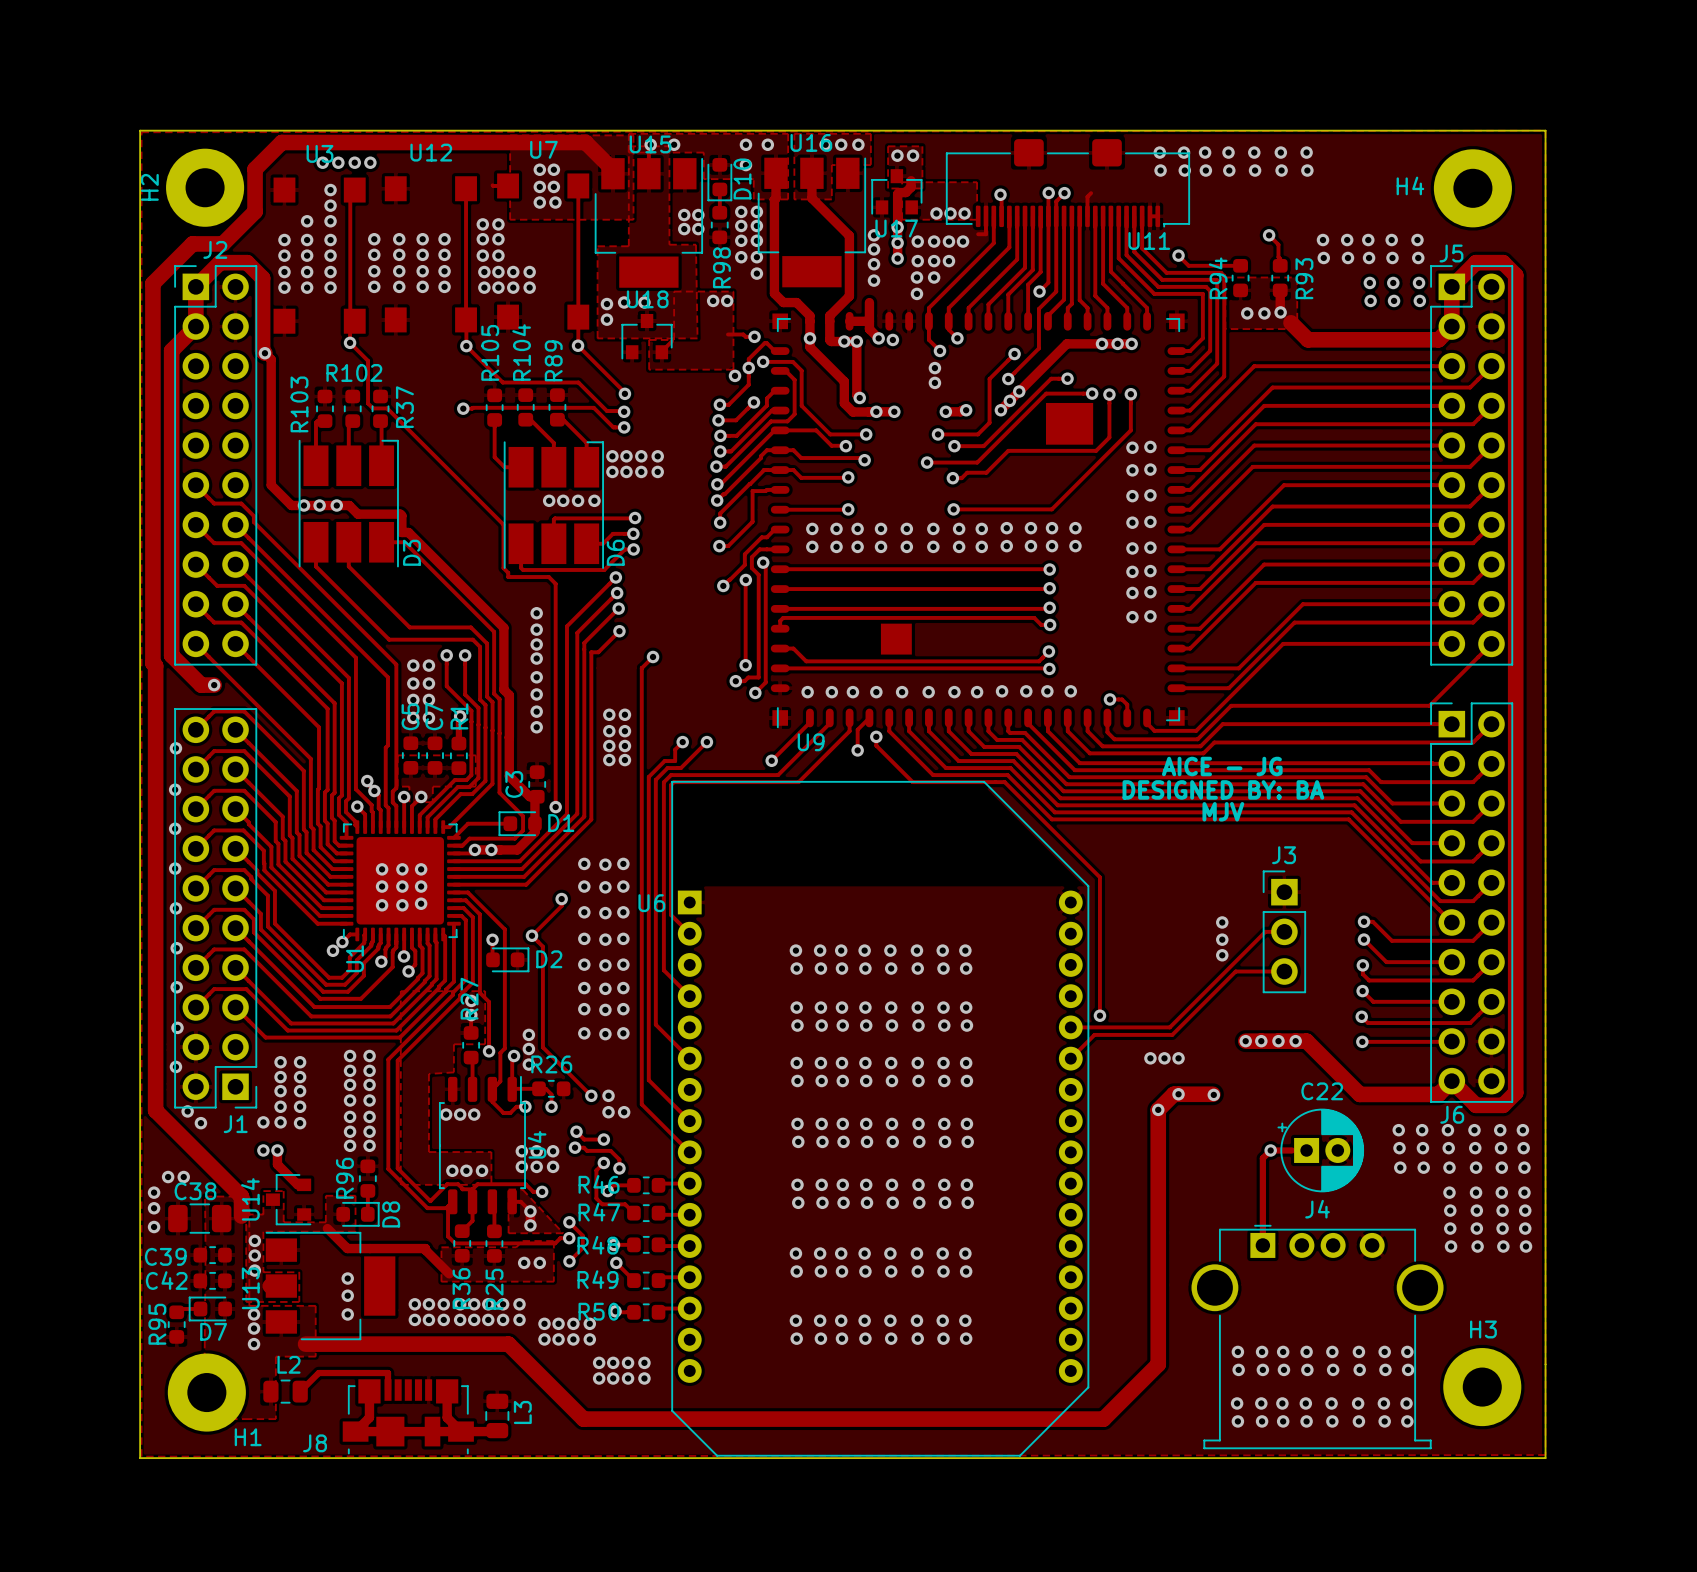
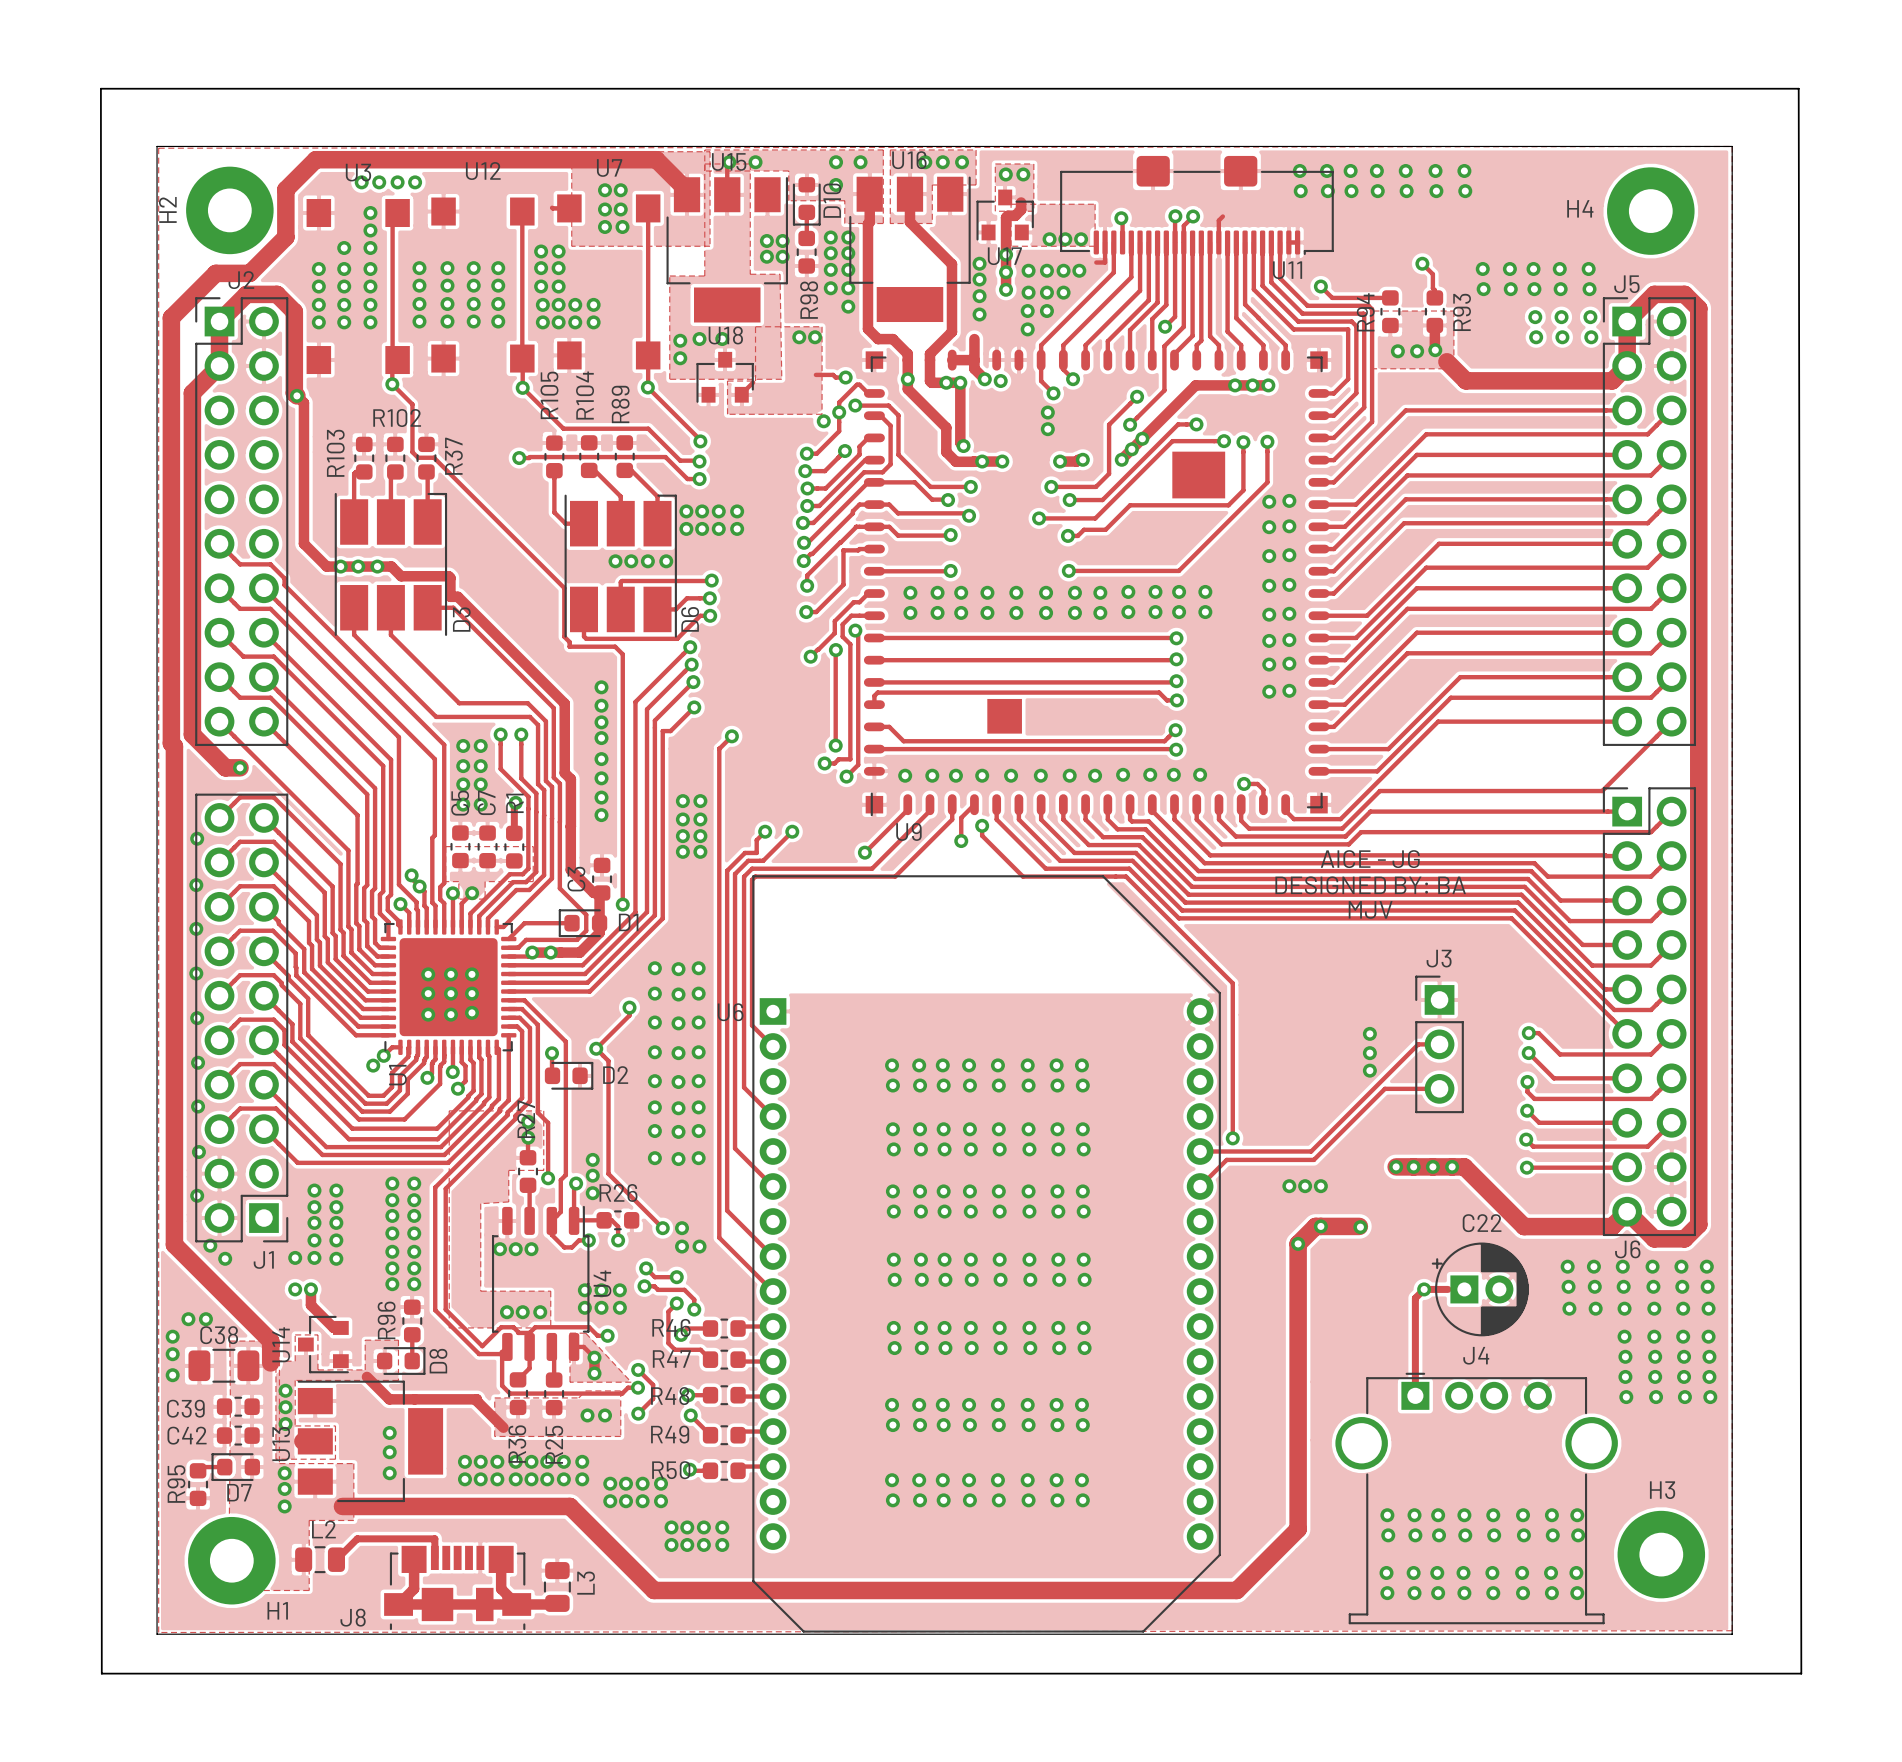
board edge: none -> (100, 88) (1798, 88) (1801, 1673) (101, 1673) (100, 88)

